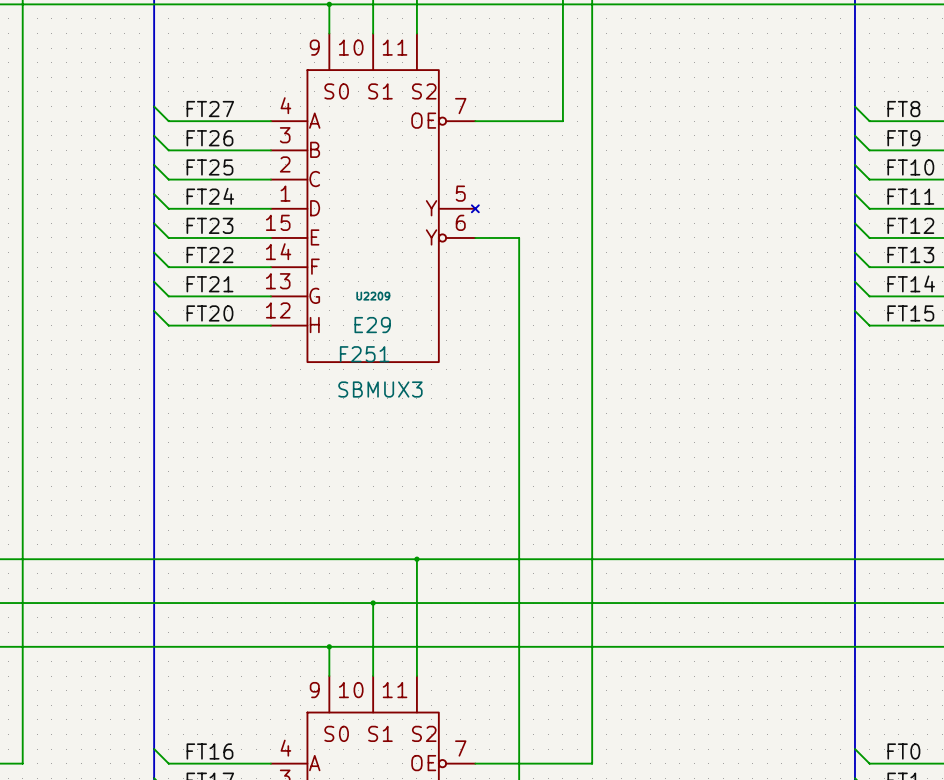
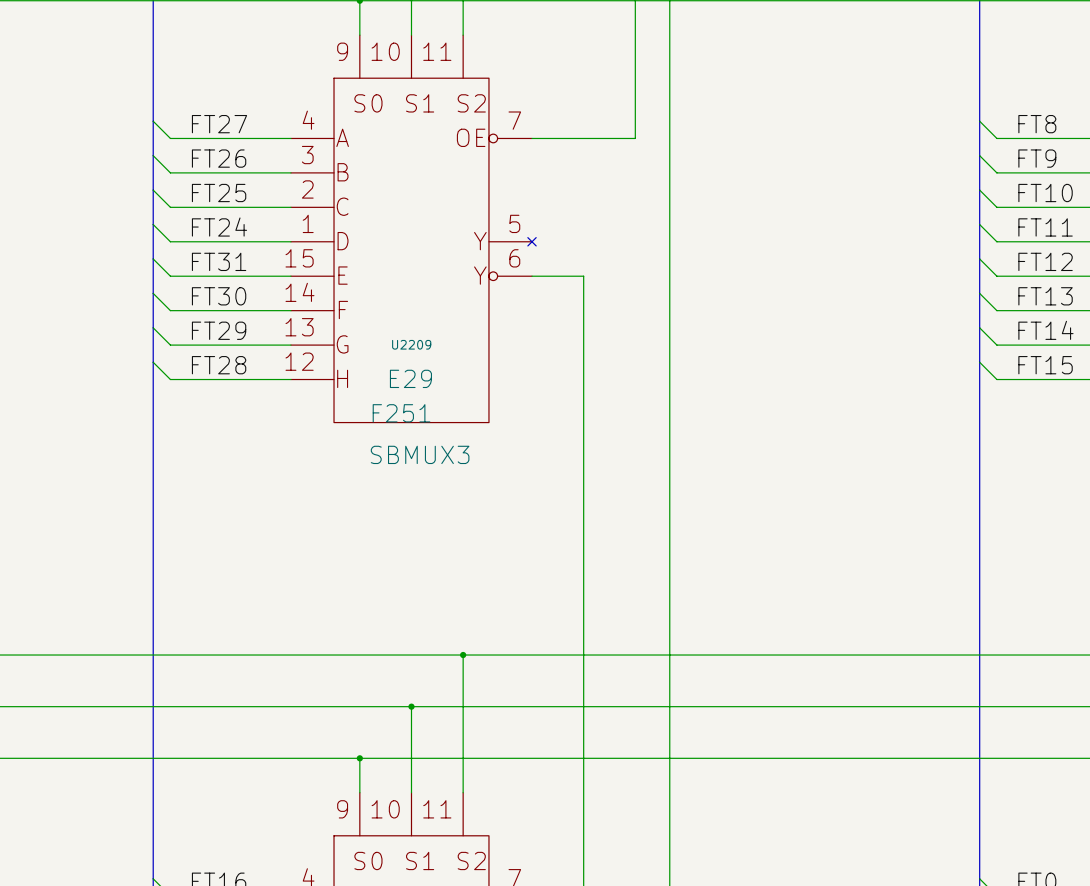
label: FT23 (209, 225) -> FT31 (219, 261)
label: FT22 (209, 255) -> FT30 (219, 296)
label: FT21 (209, 284) -> FT29 (219, 330)
label: FT20 (209, 313) -> FT28 (219, 365)

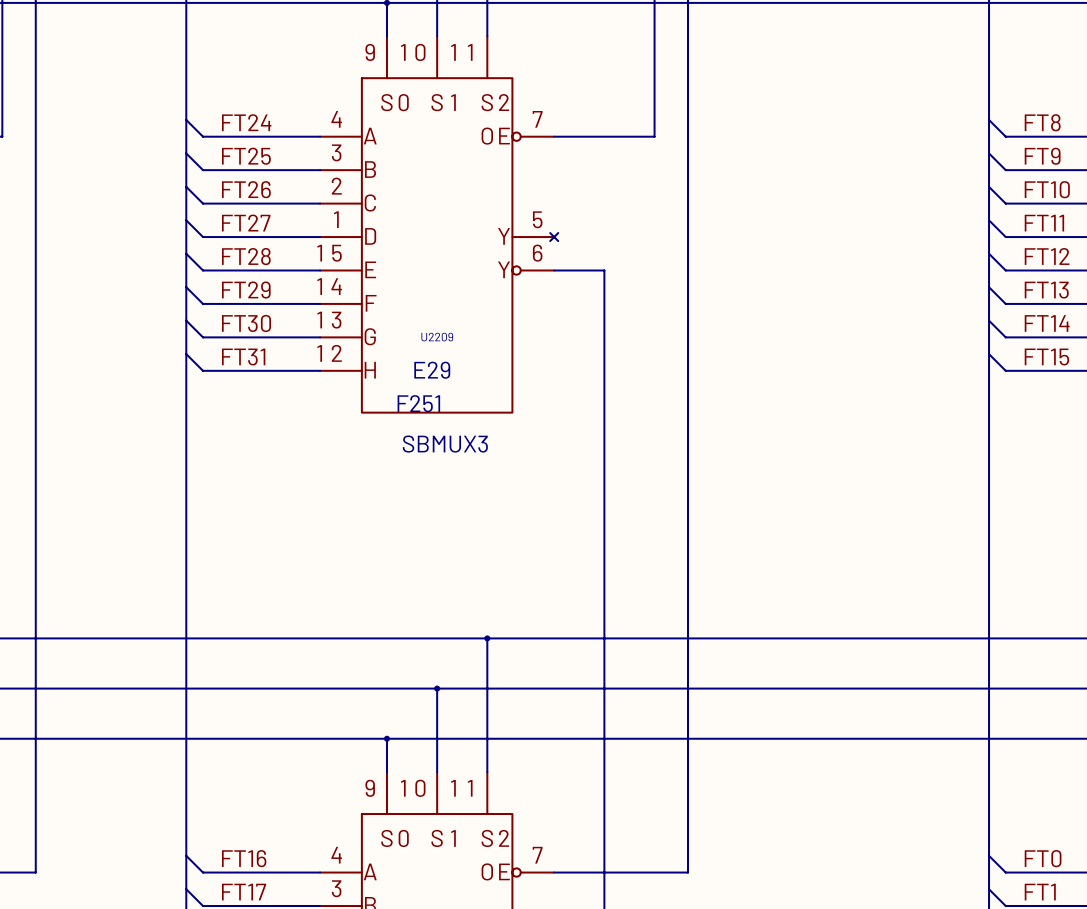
label: FT27 (219, 124) -> FT24 (246, 122)
label: FT26 (219, 158) -> FT25 (246, 156)
label: FT25 (219, 193) -> FT26 (246, 189)
label: FT24 (219, 227) -> FT27 (246, 223)
label: FT31 (219, 261) -> FT28 (246, 256)
label: FT30 (219, 296) -> FT29 (246, 290)
label: FT29 (219, 330) -> FT30 (246, 323)
label: FT28 (219, 365) -> FT31 (243, 357)

